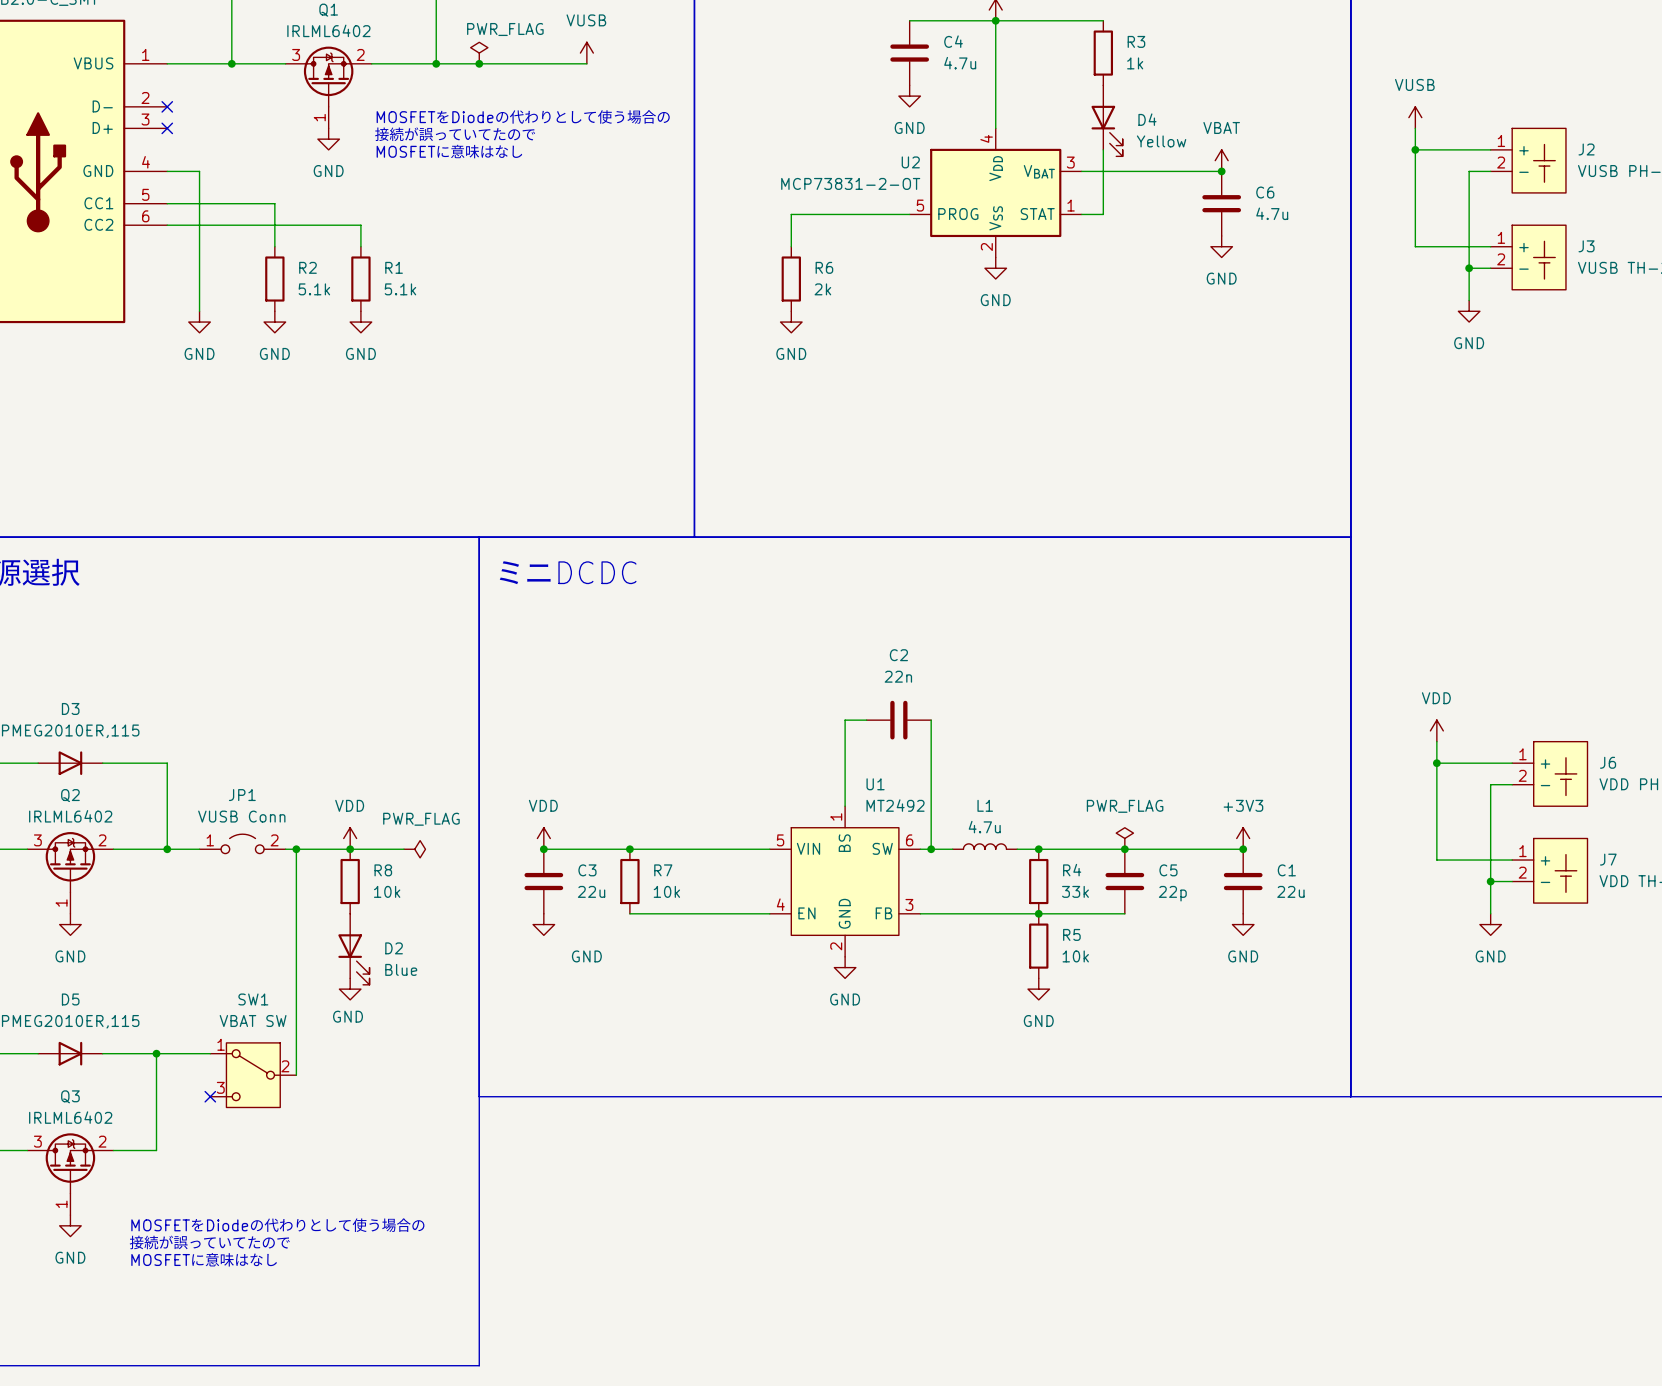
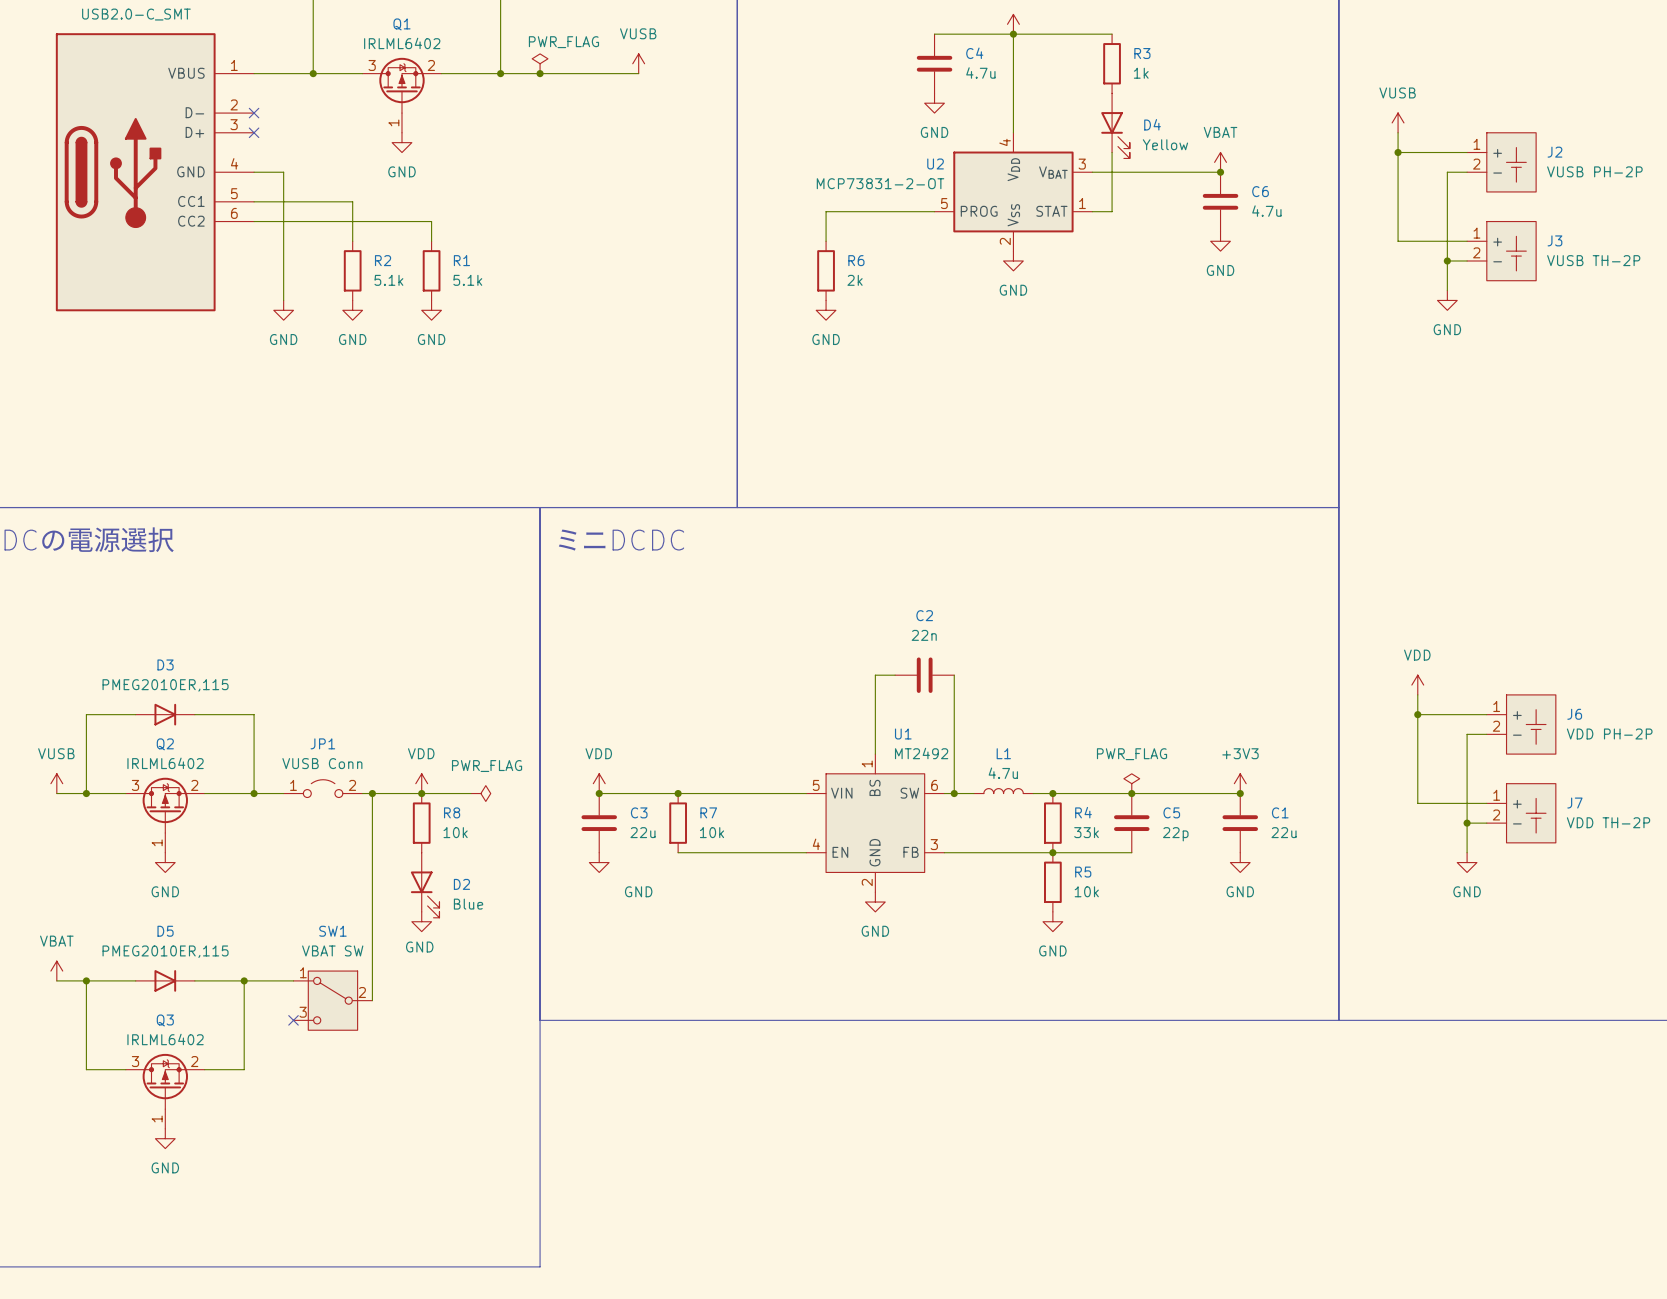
text: MOSFETをDiodeの代わりとして使う場合の (523, 116) -> none
text: 接続が誤っていてたので (455, 134) -> none
text: MOSFETに意味はなし (449, 151) -> none
text: MOSFETをDiodeの代わりとして使う場合の (278, 1225) -> none
text: 接続が誤っていてたので (209, 1242) -> none
text: MOSFETに意味はなし (204, 1259) -> none

